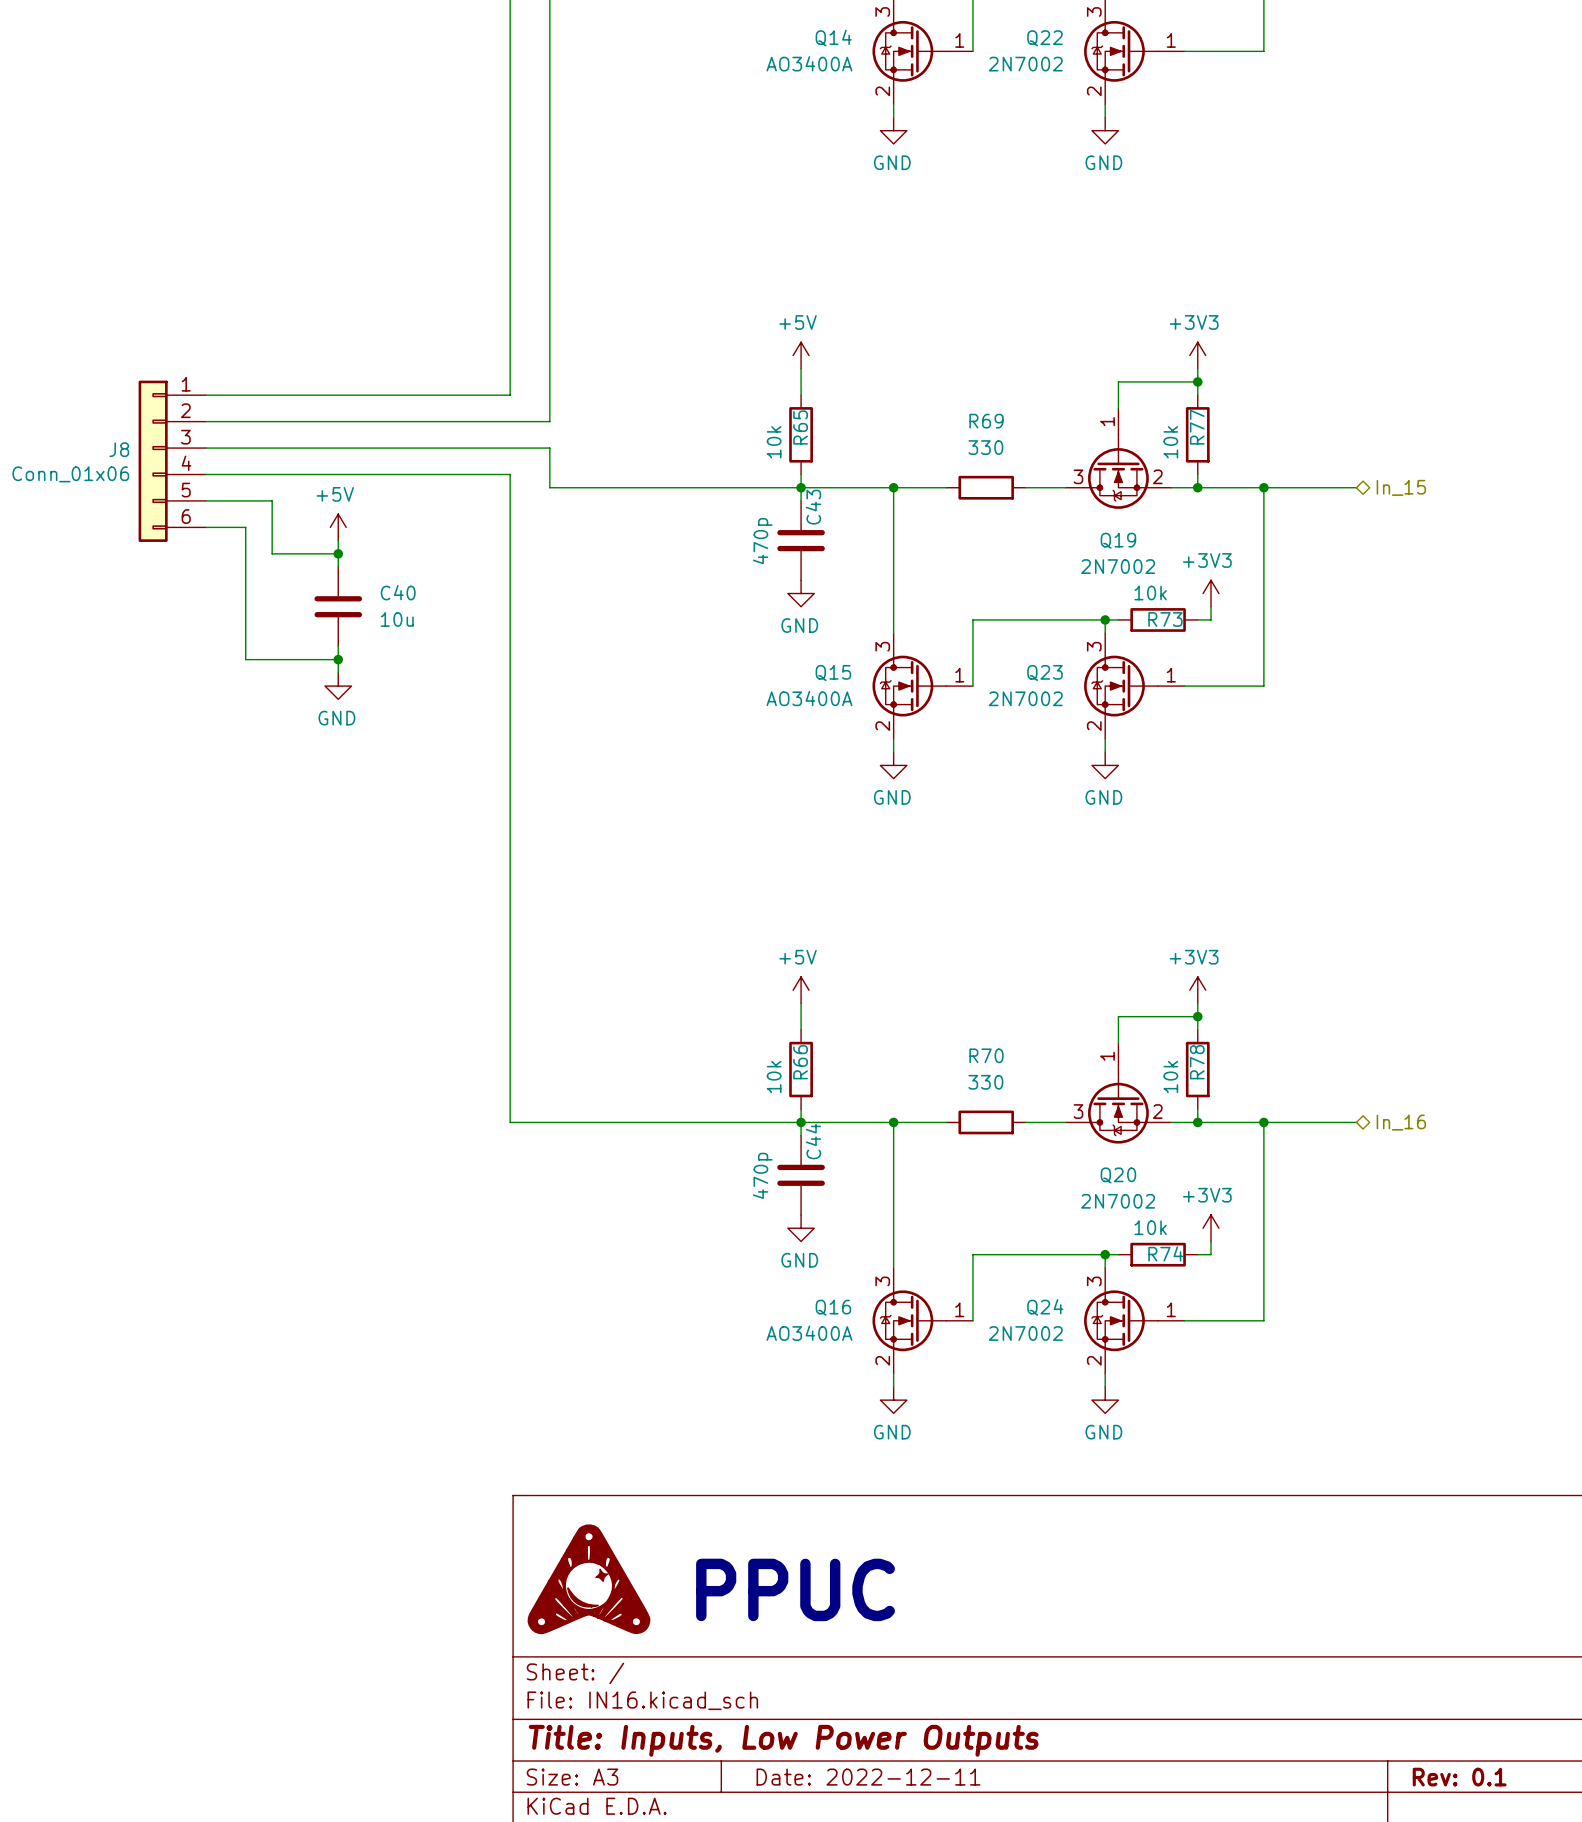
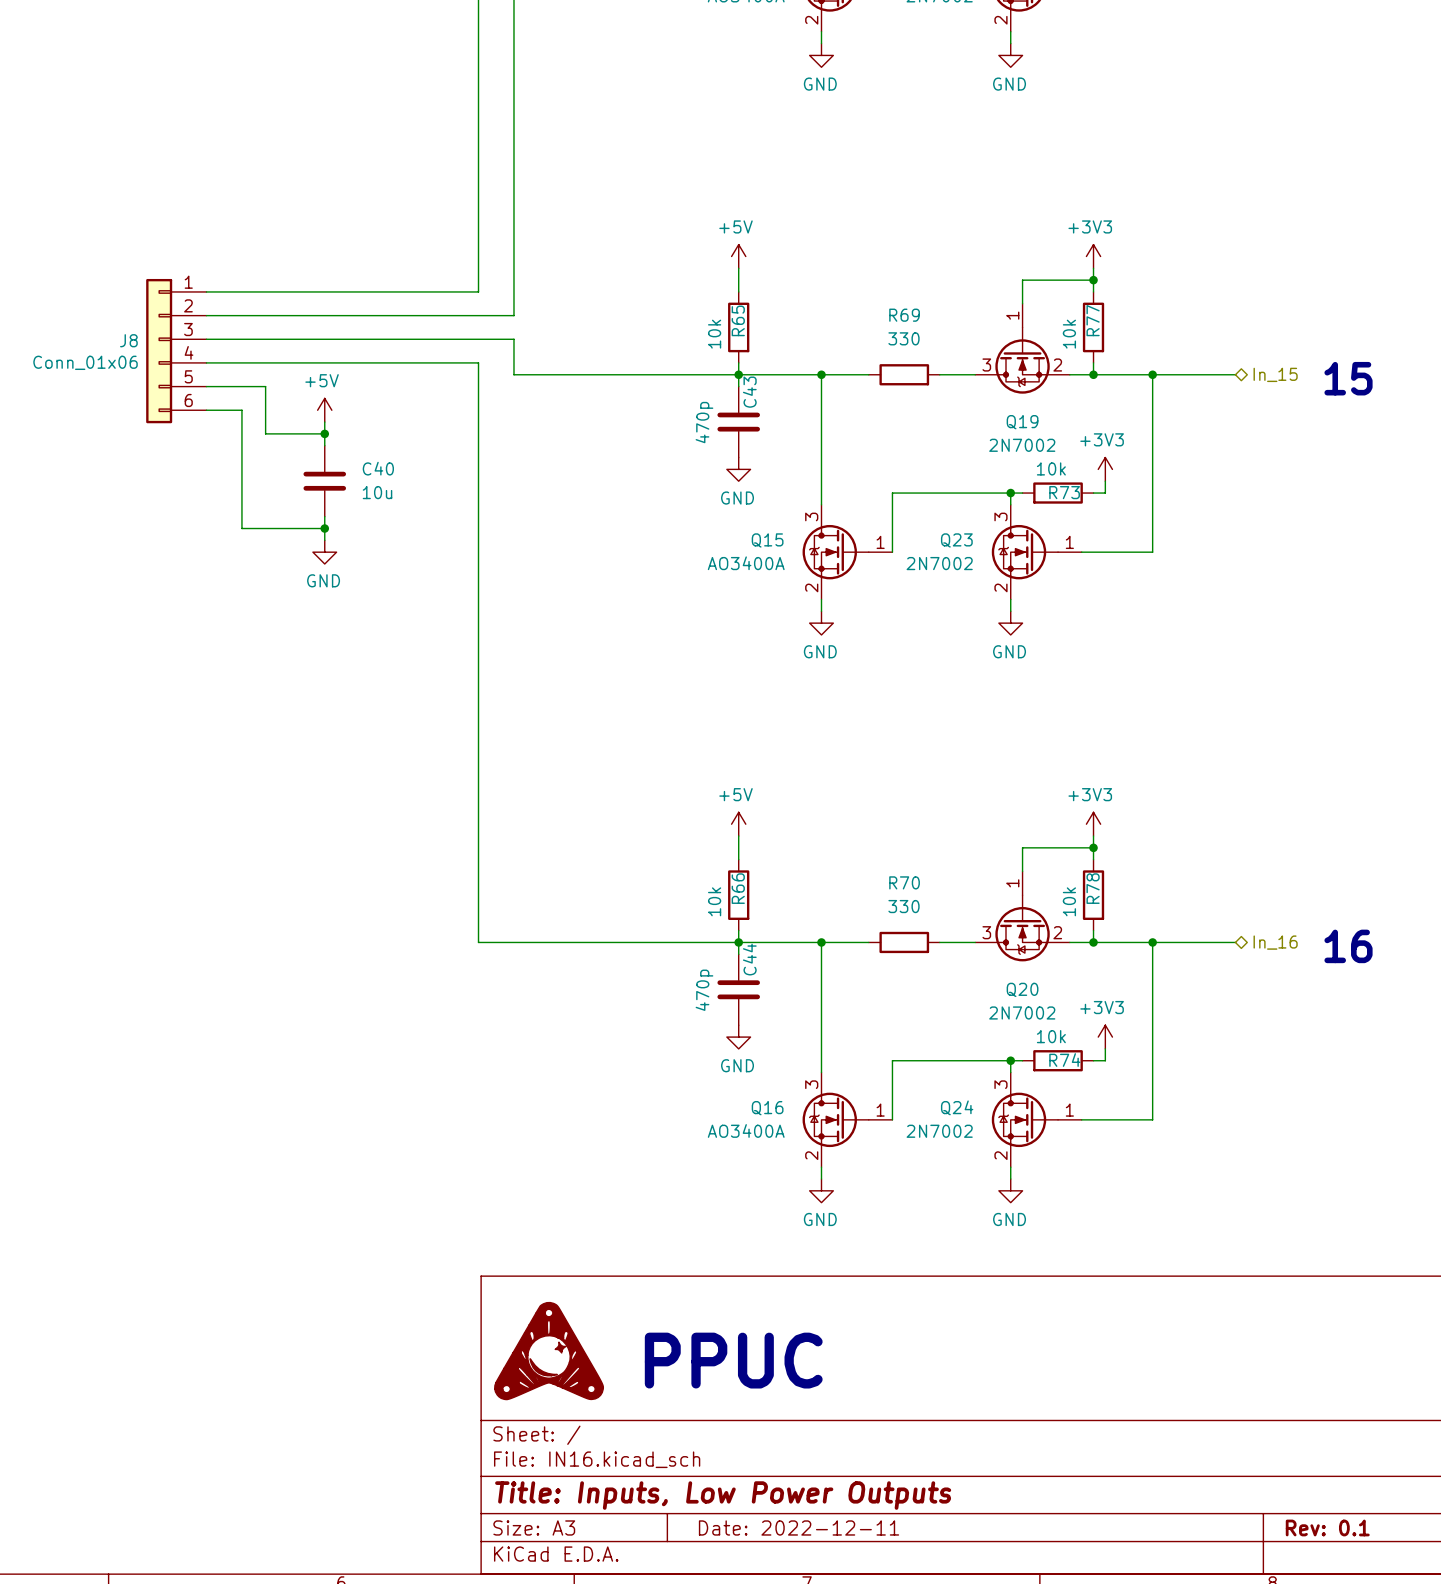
text: none -> 15 (1348, 378)
text: none -> 16 (1348, 946)

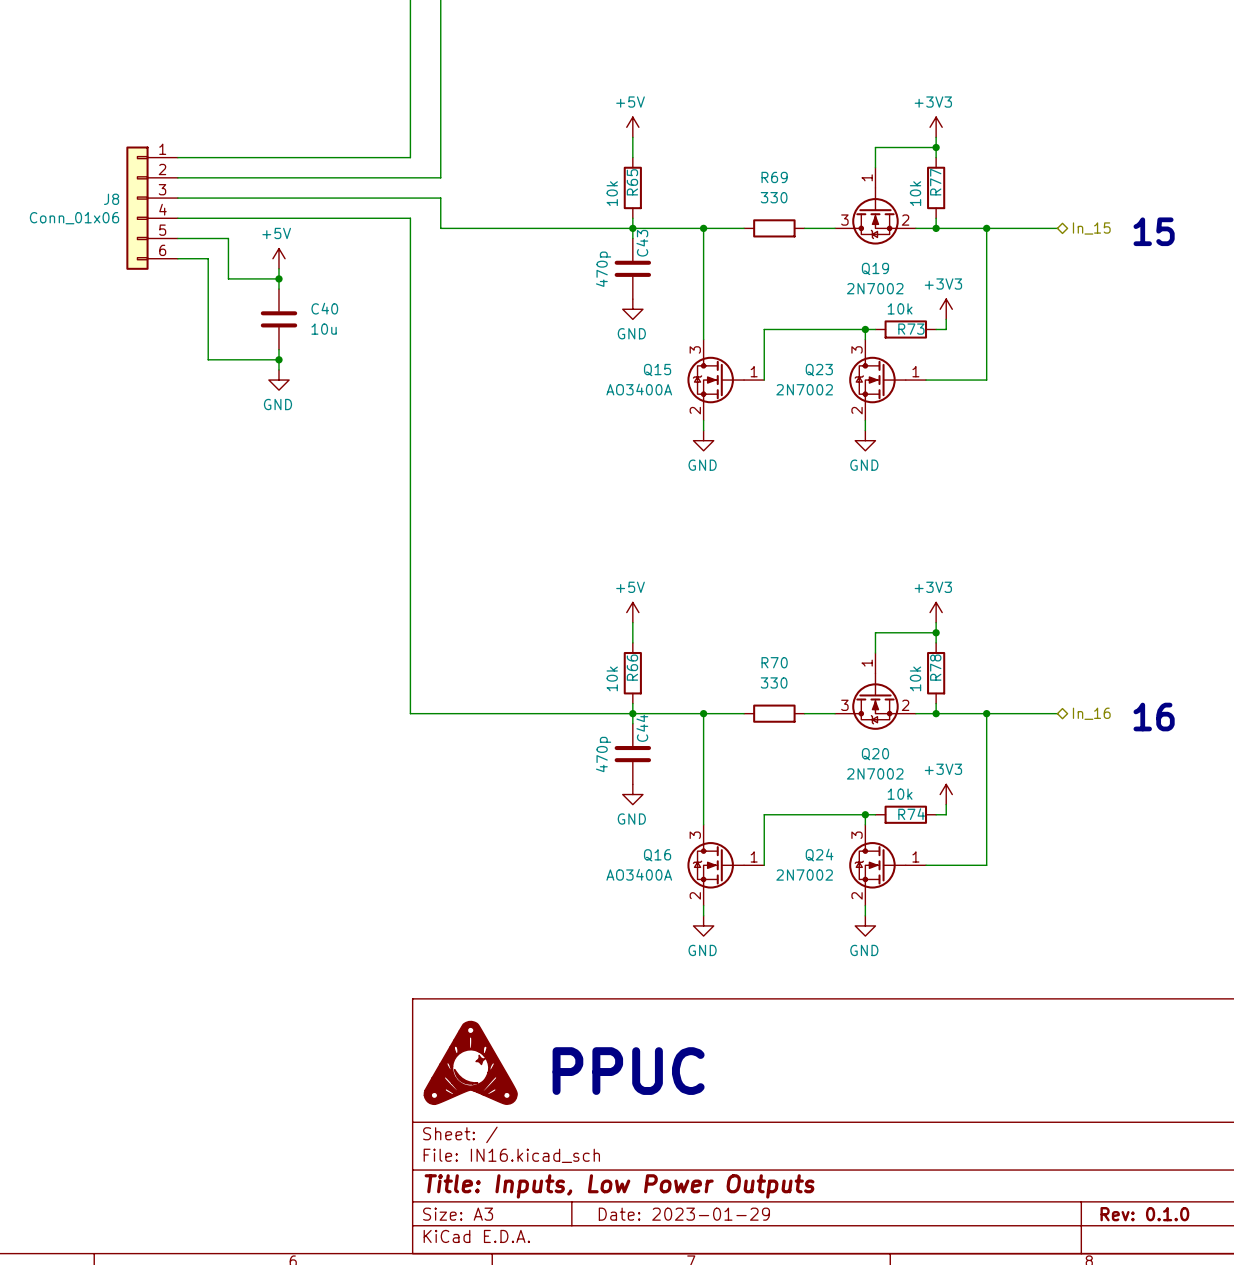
title block: Date: 2022-12-11 (799, 1527) -> Date: 2023-01-29 (684, 1214)
title block: Rev: 0.1 (1327, 1527) -> Rev: 0.1.0 (1144, 1214)

